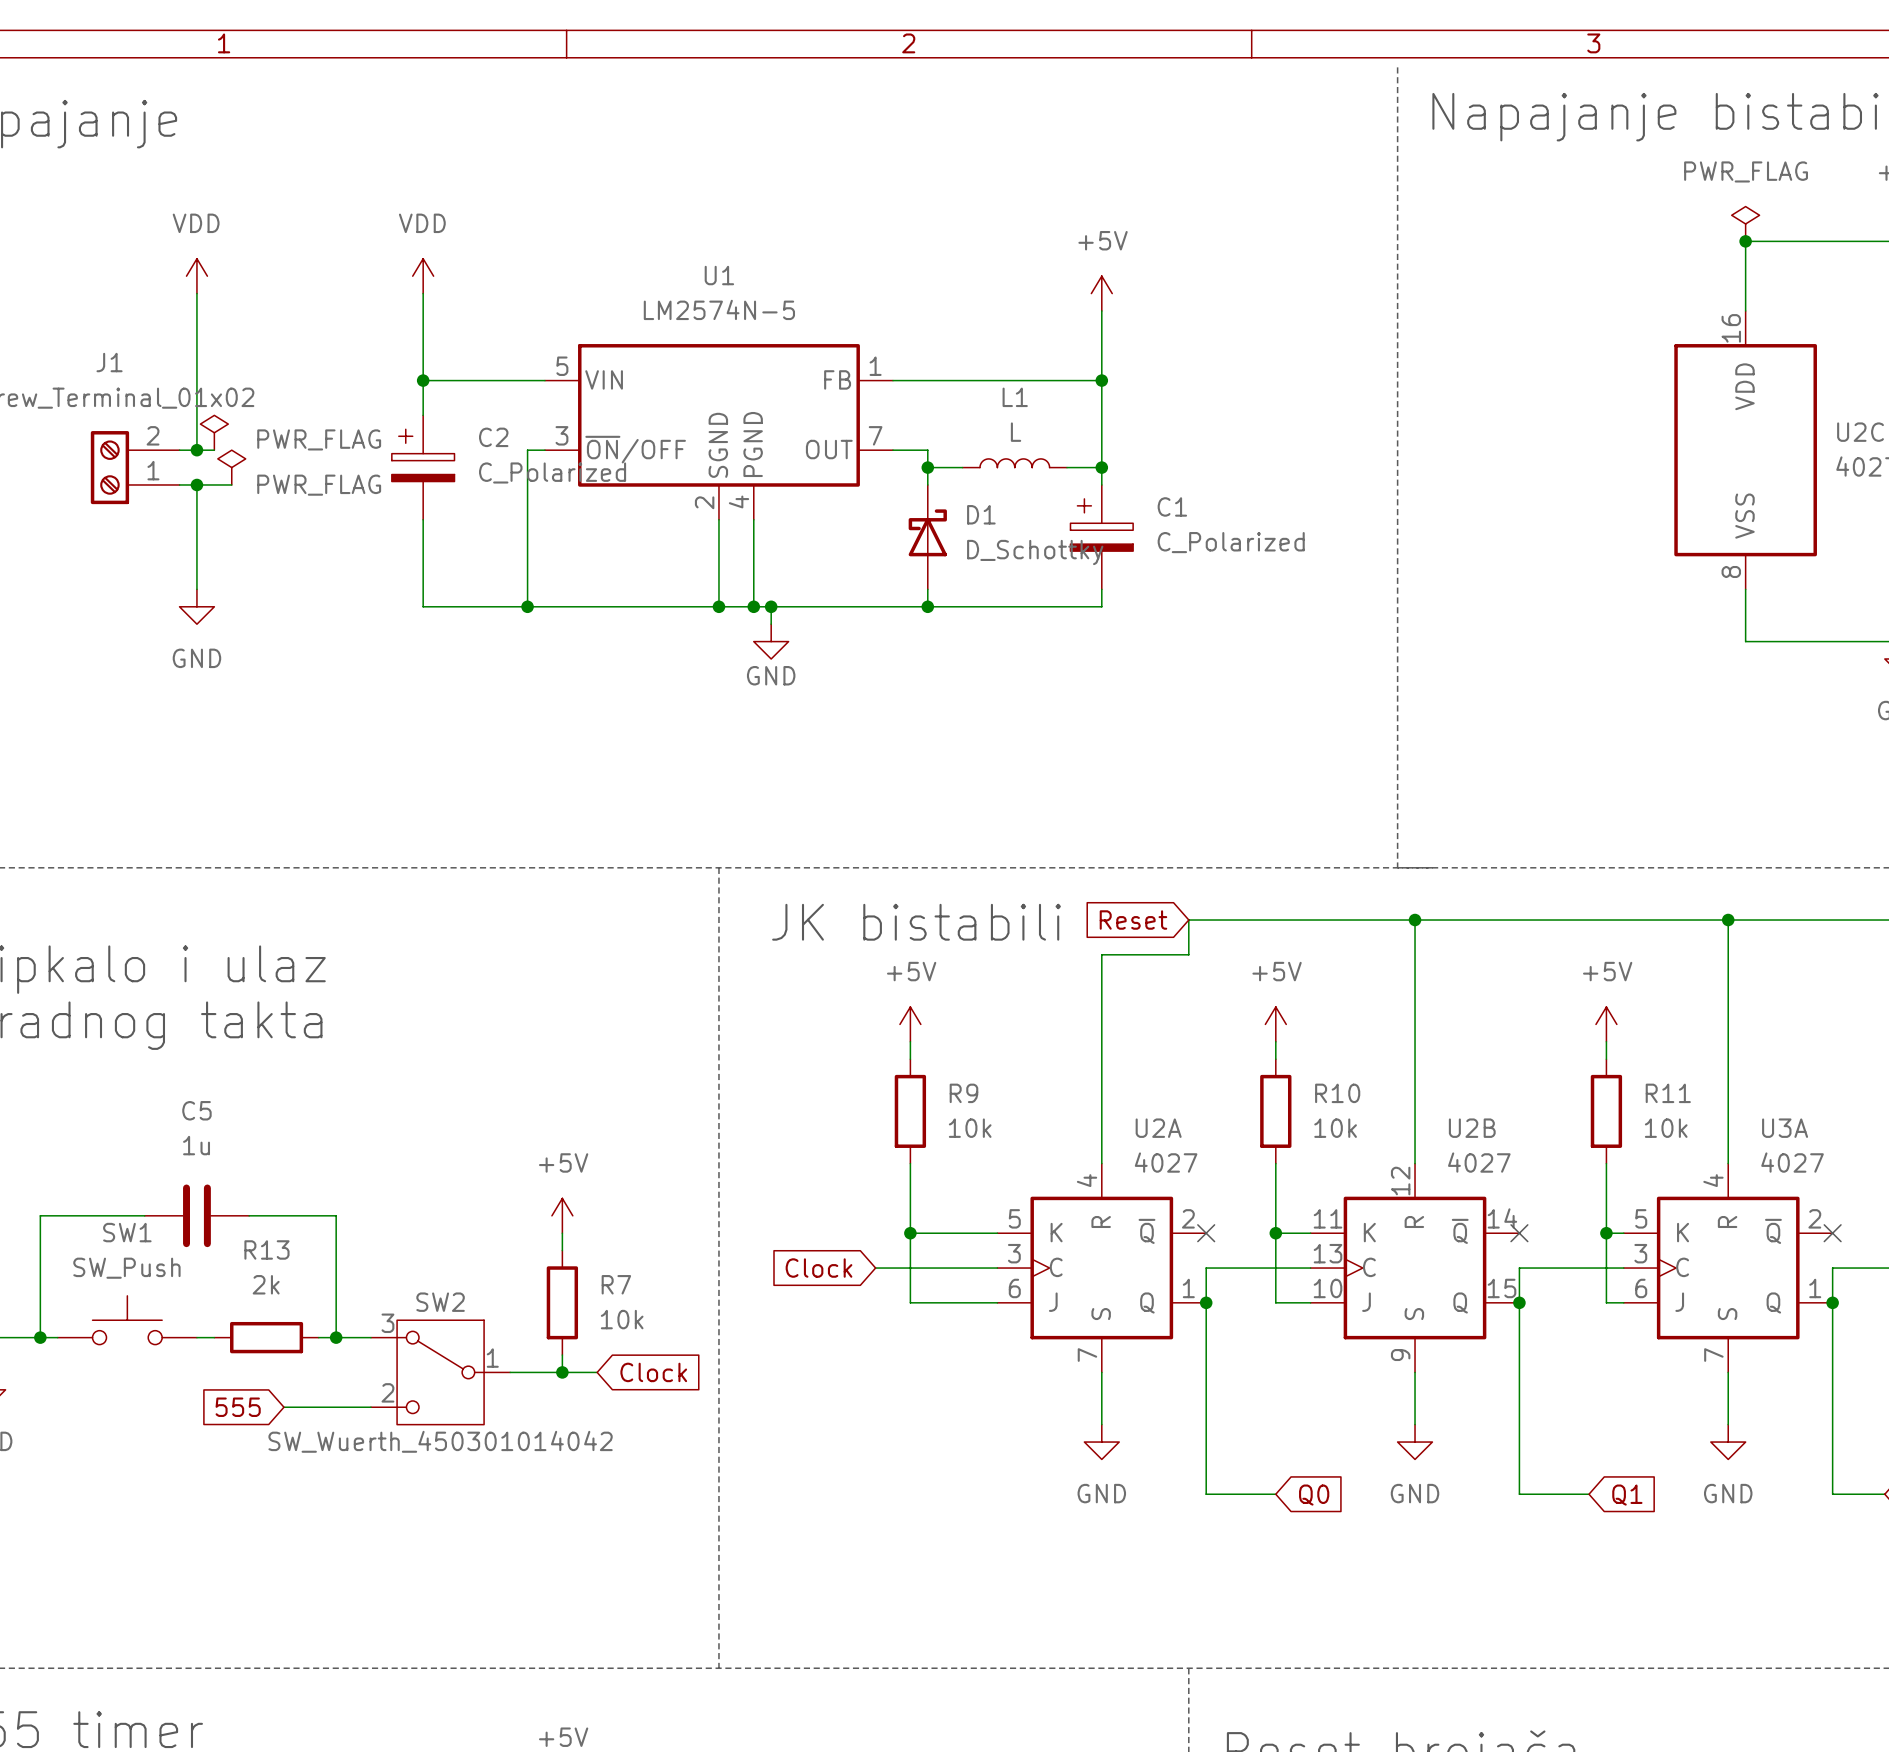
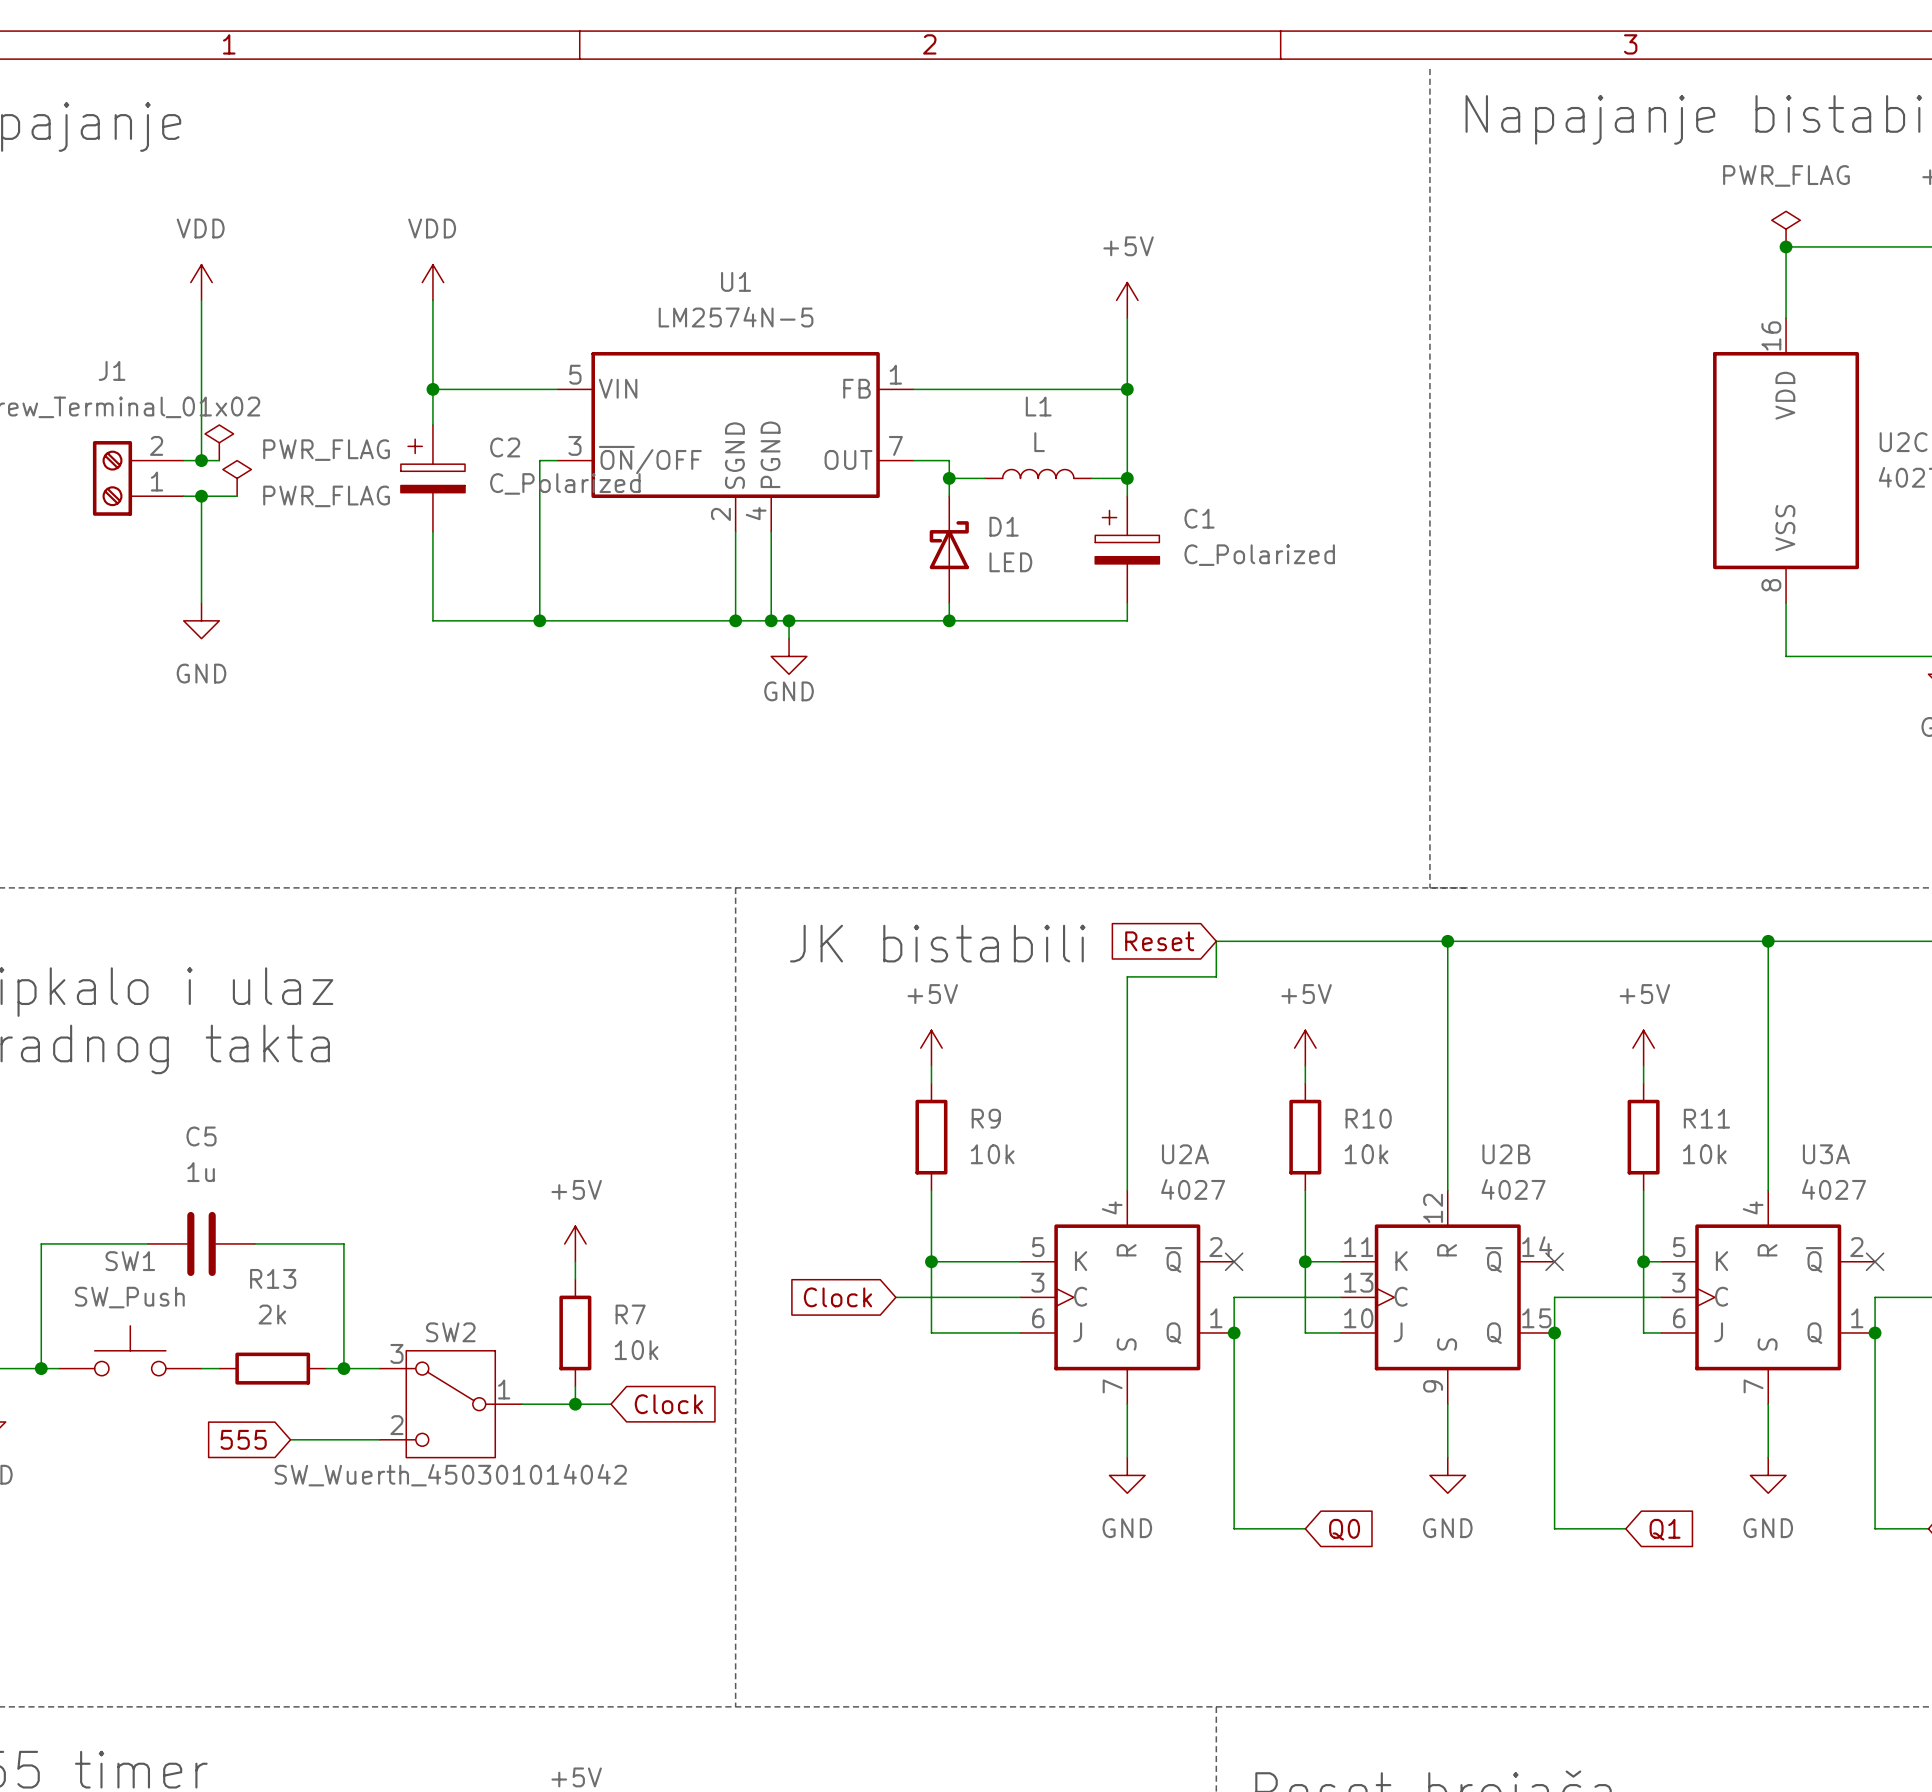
D1 value: D_Schottky (1035, 552) -> LED (1010, 562)

